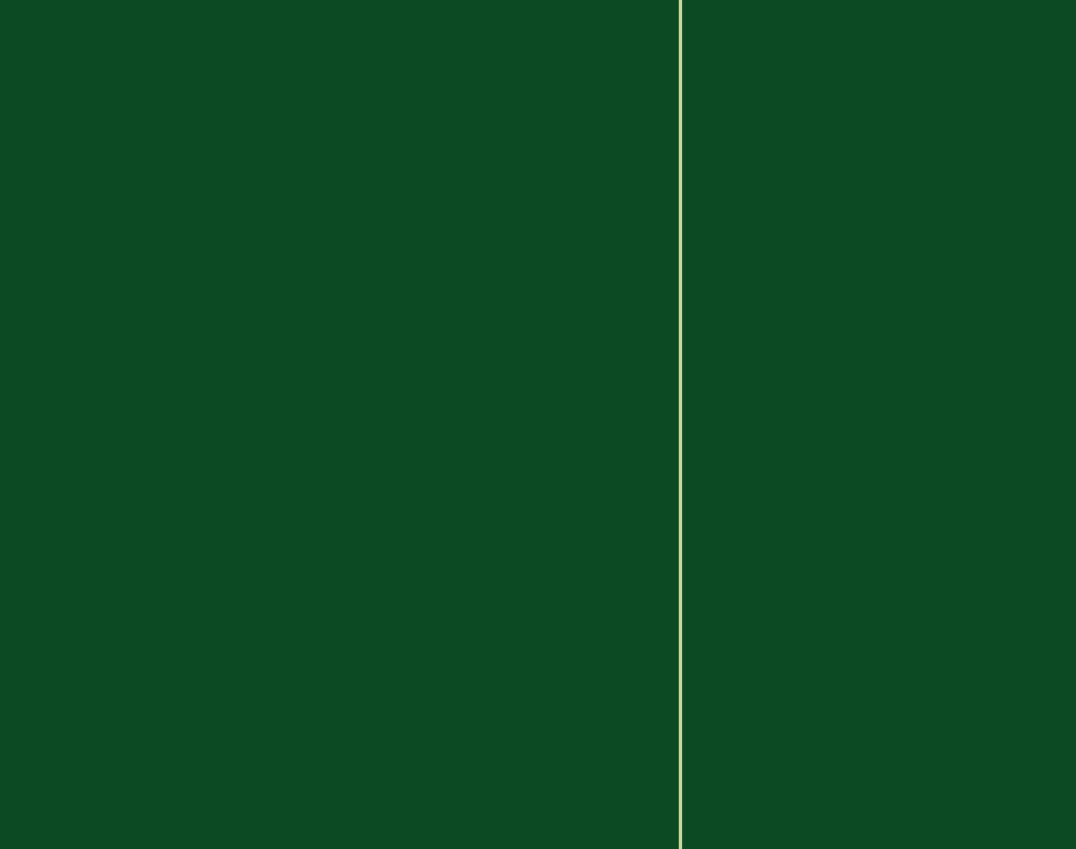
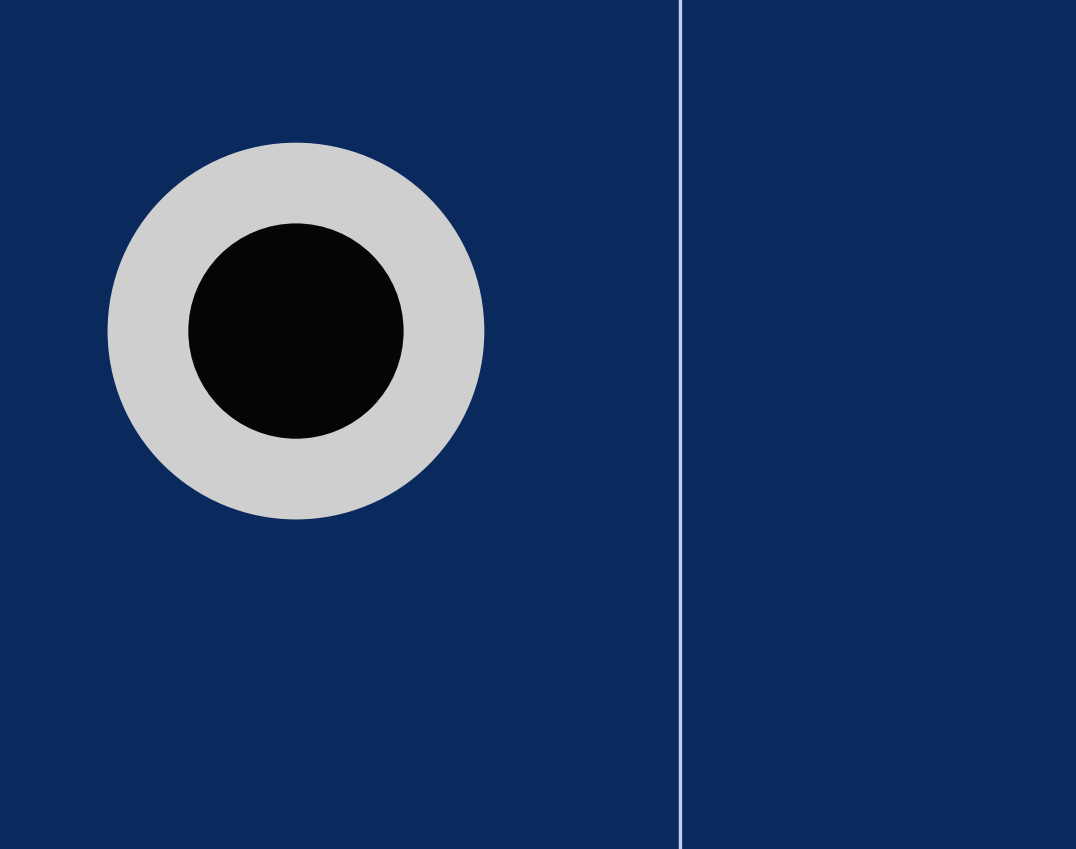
part: none -> (295, 331)

